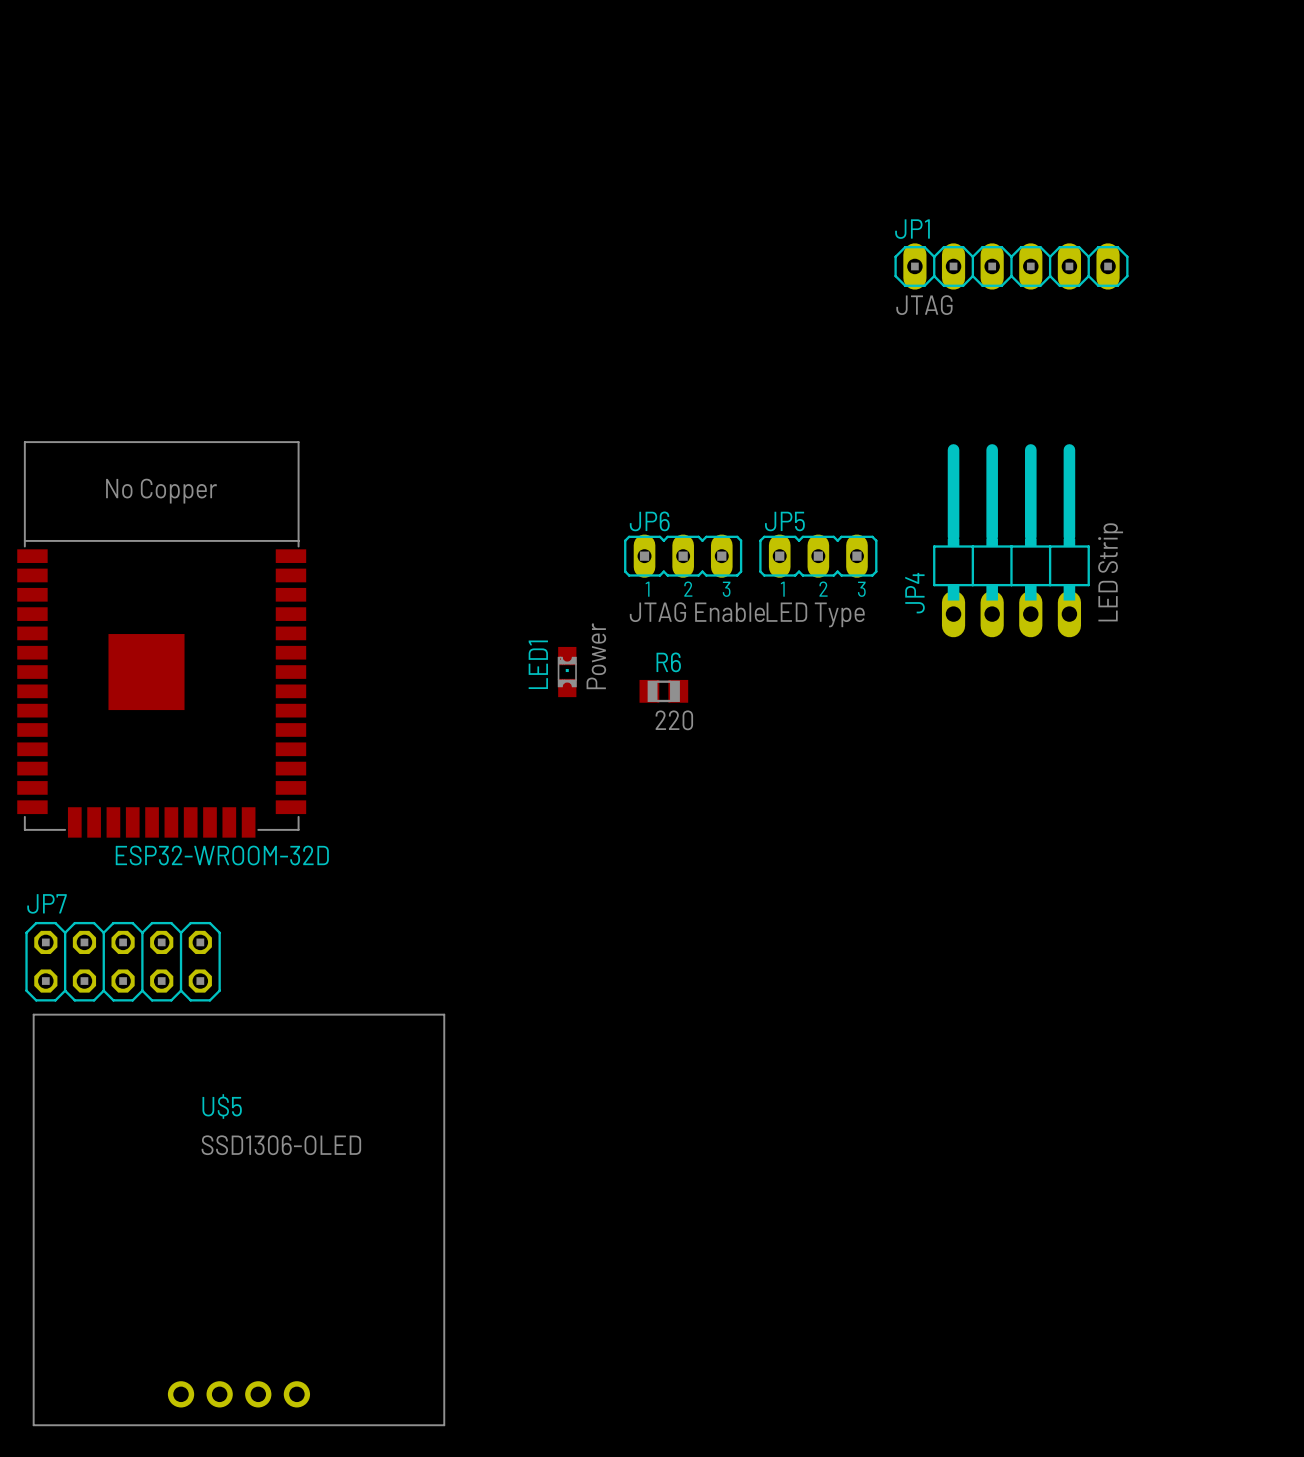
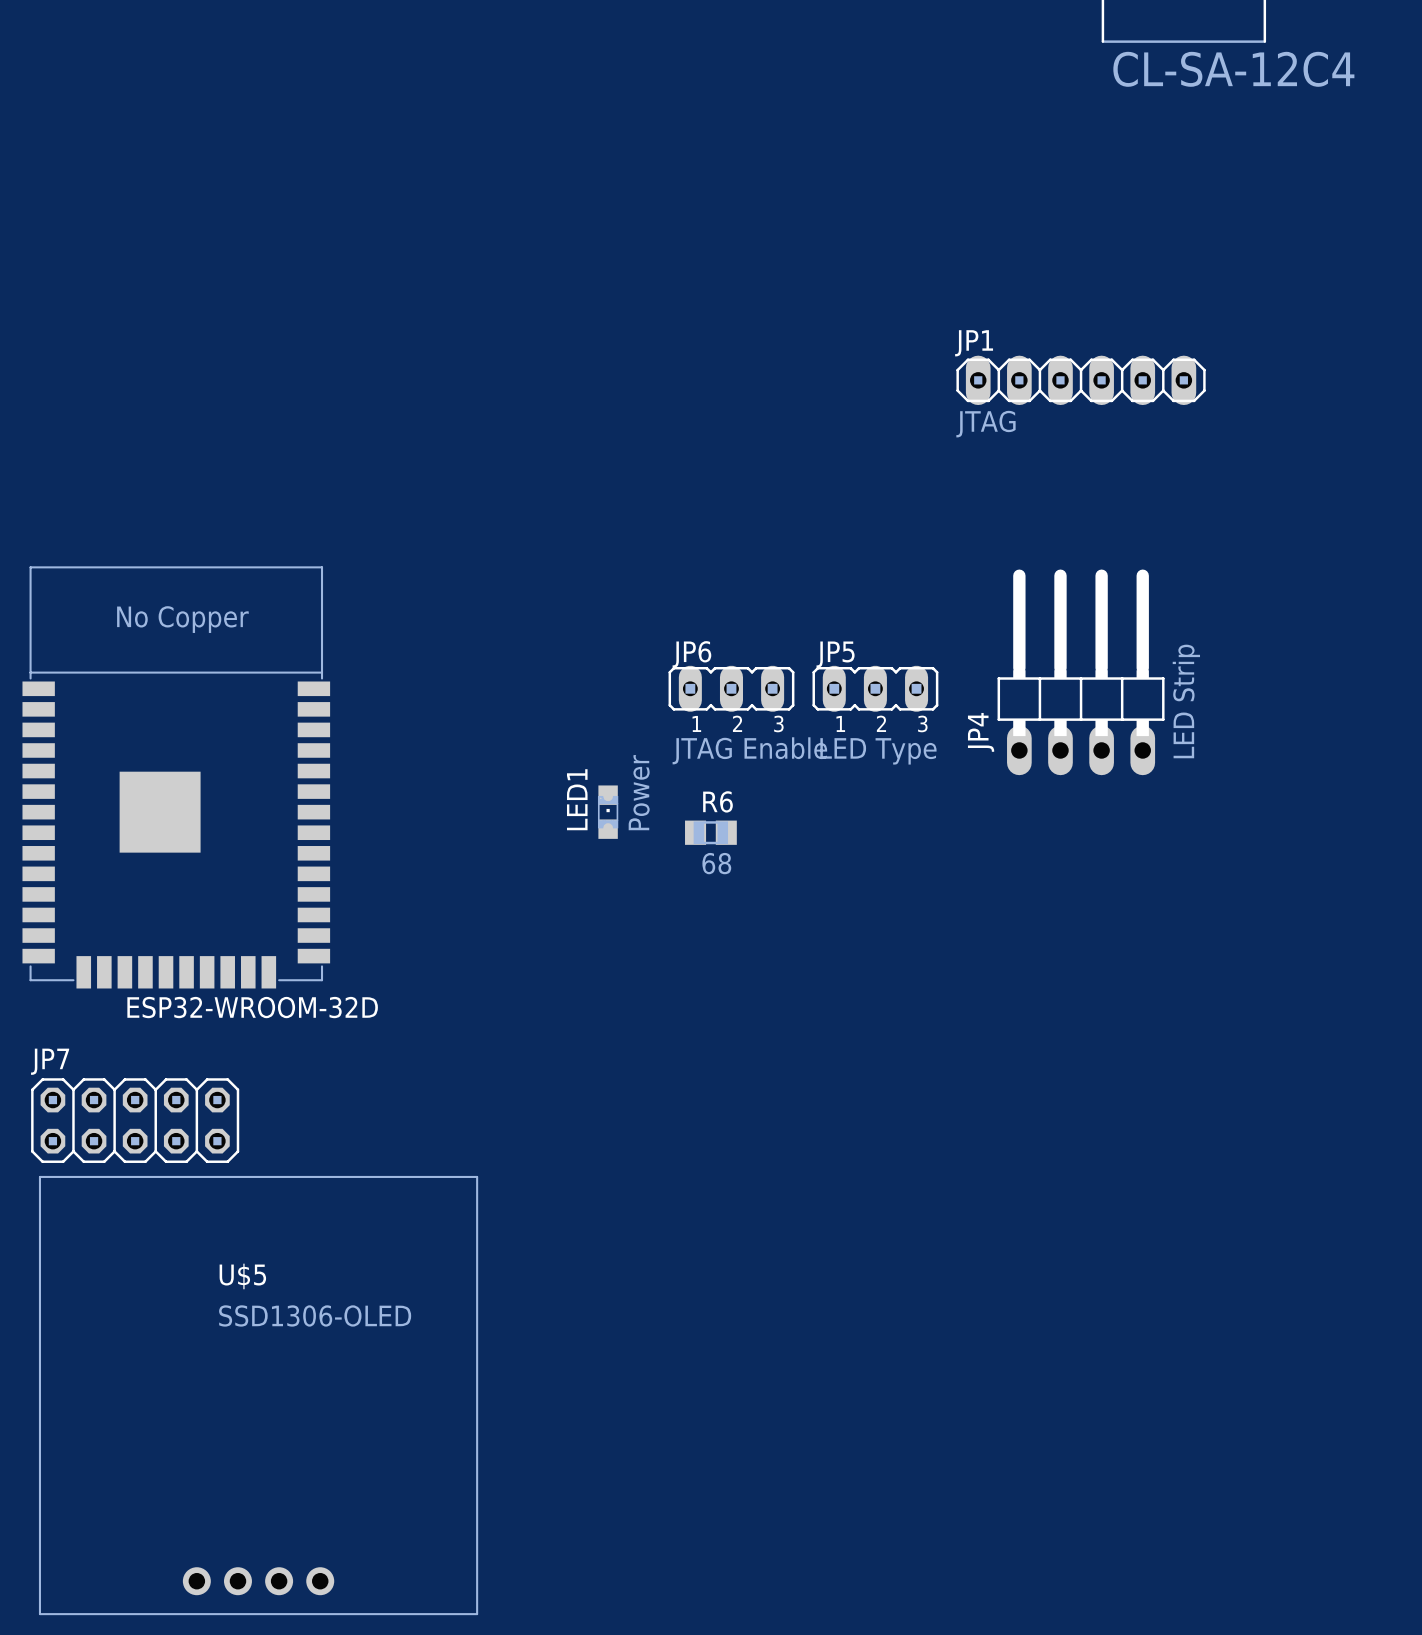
R6 value: 220 (674, 720) -> 68 (716, 863)

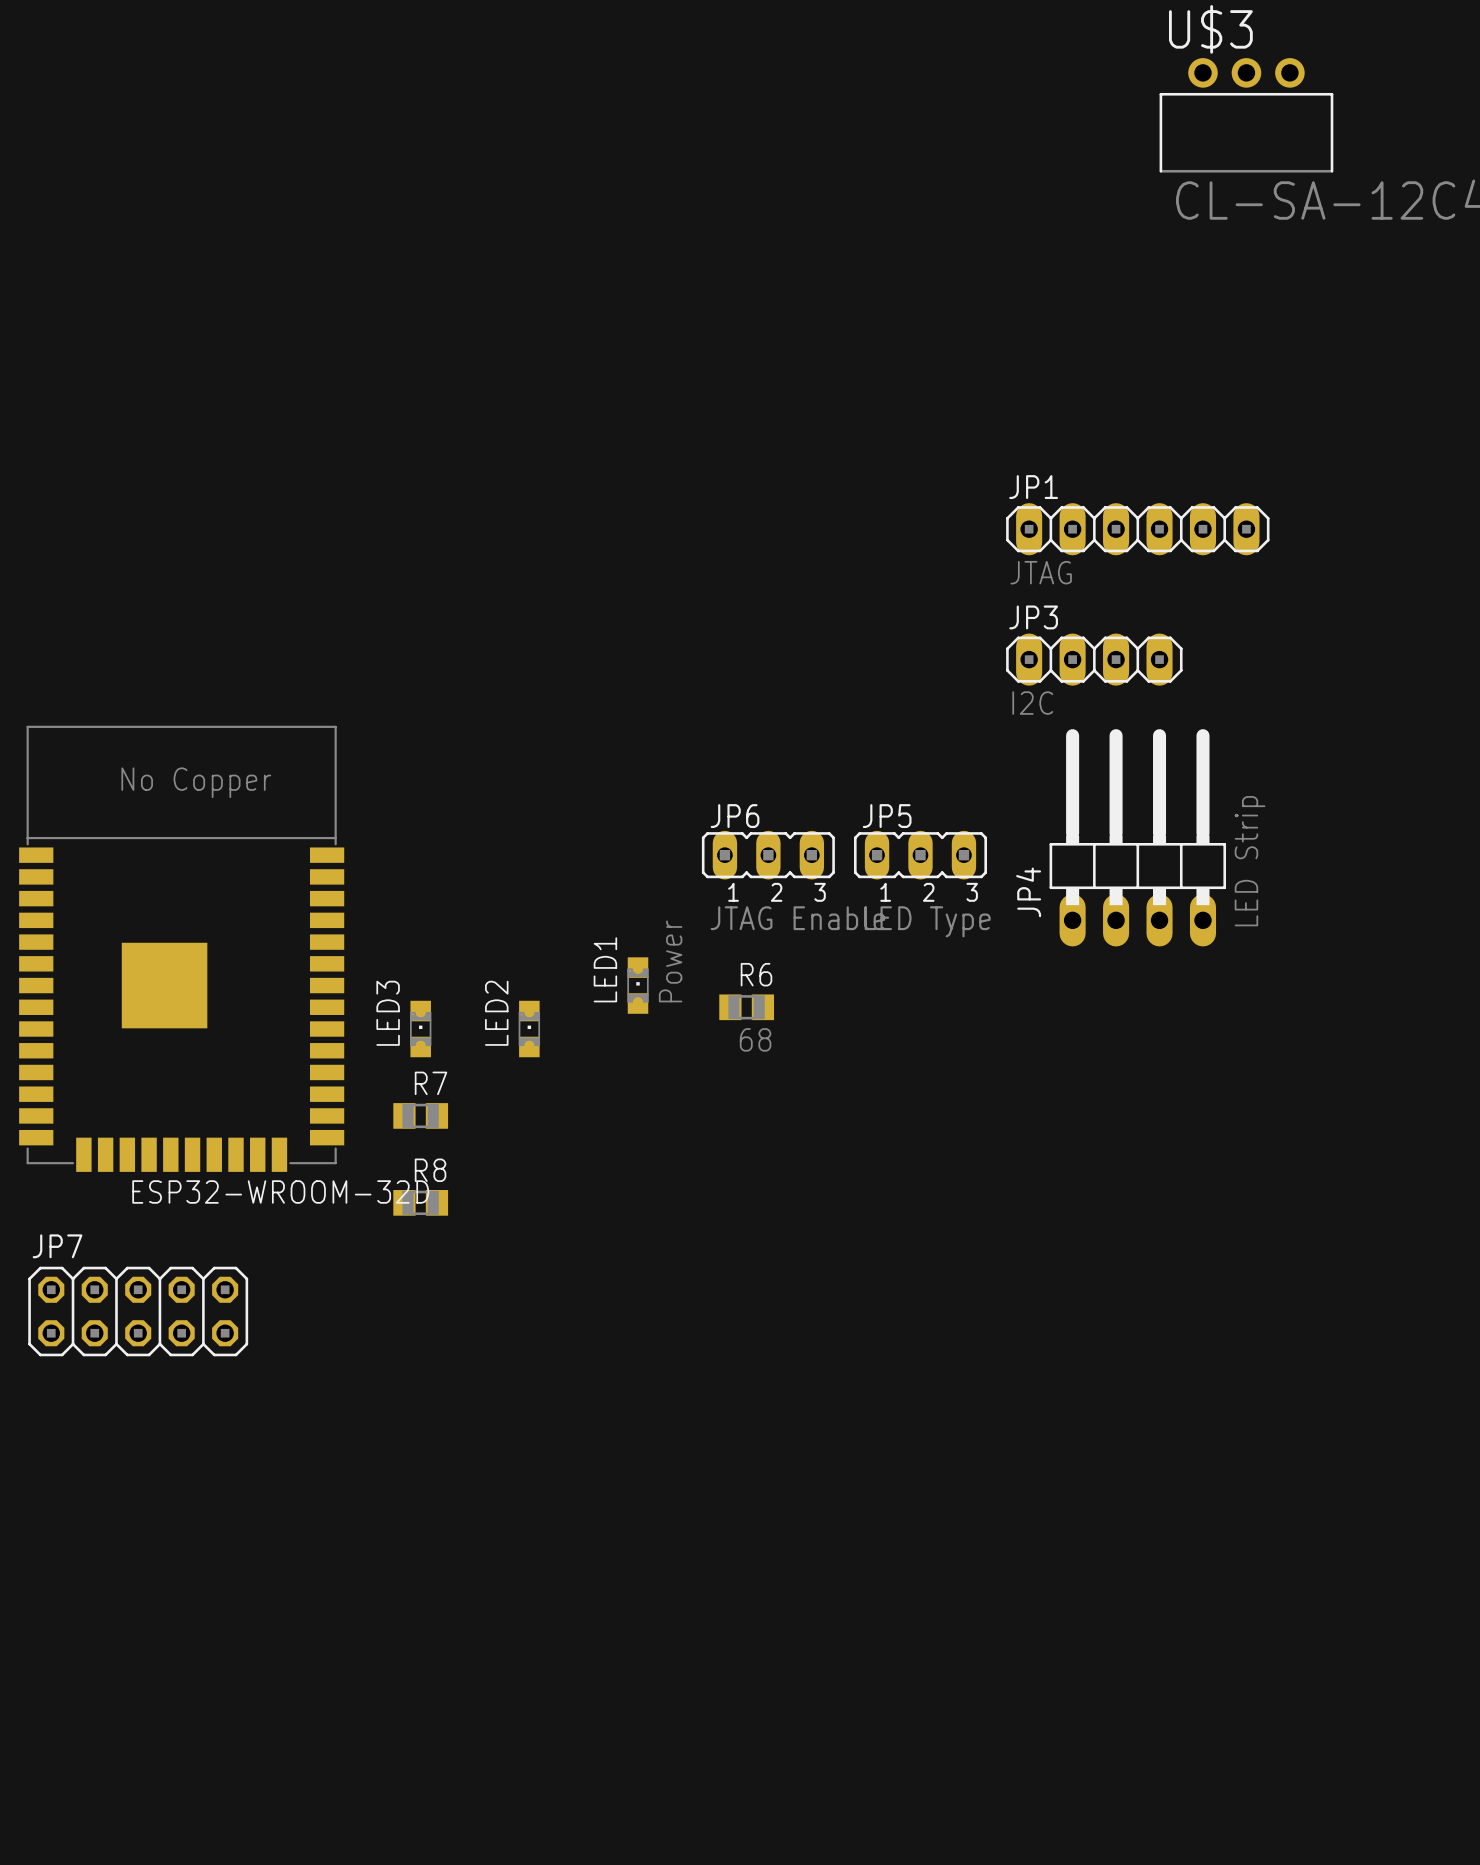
JP3: none -> I2C (1094, 659)
LED3: none -> (420, 1029)
LED2: none -> (529, 1029)
R7: none -> (420, 1115)
R8: none -> (420, 1202)
U$5: SSD1306-OLED (258, 1395) -> none

